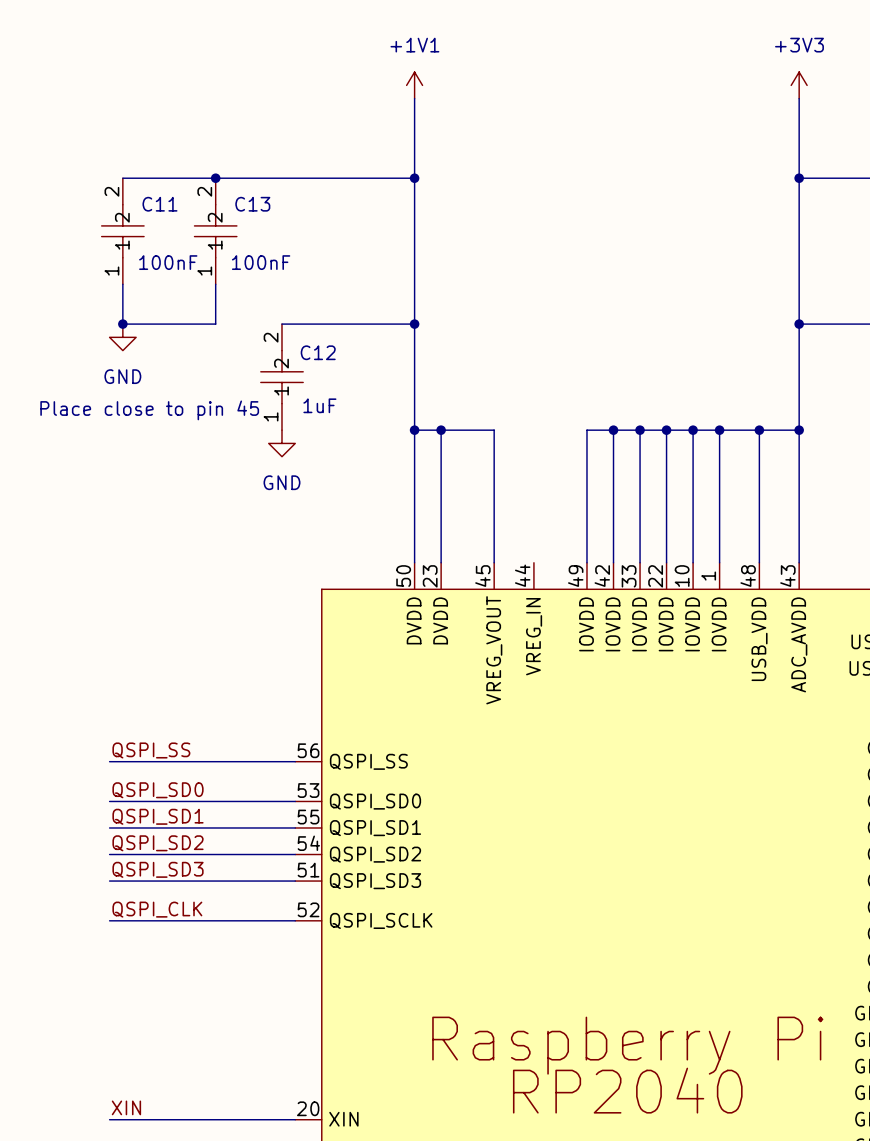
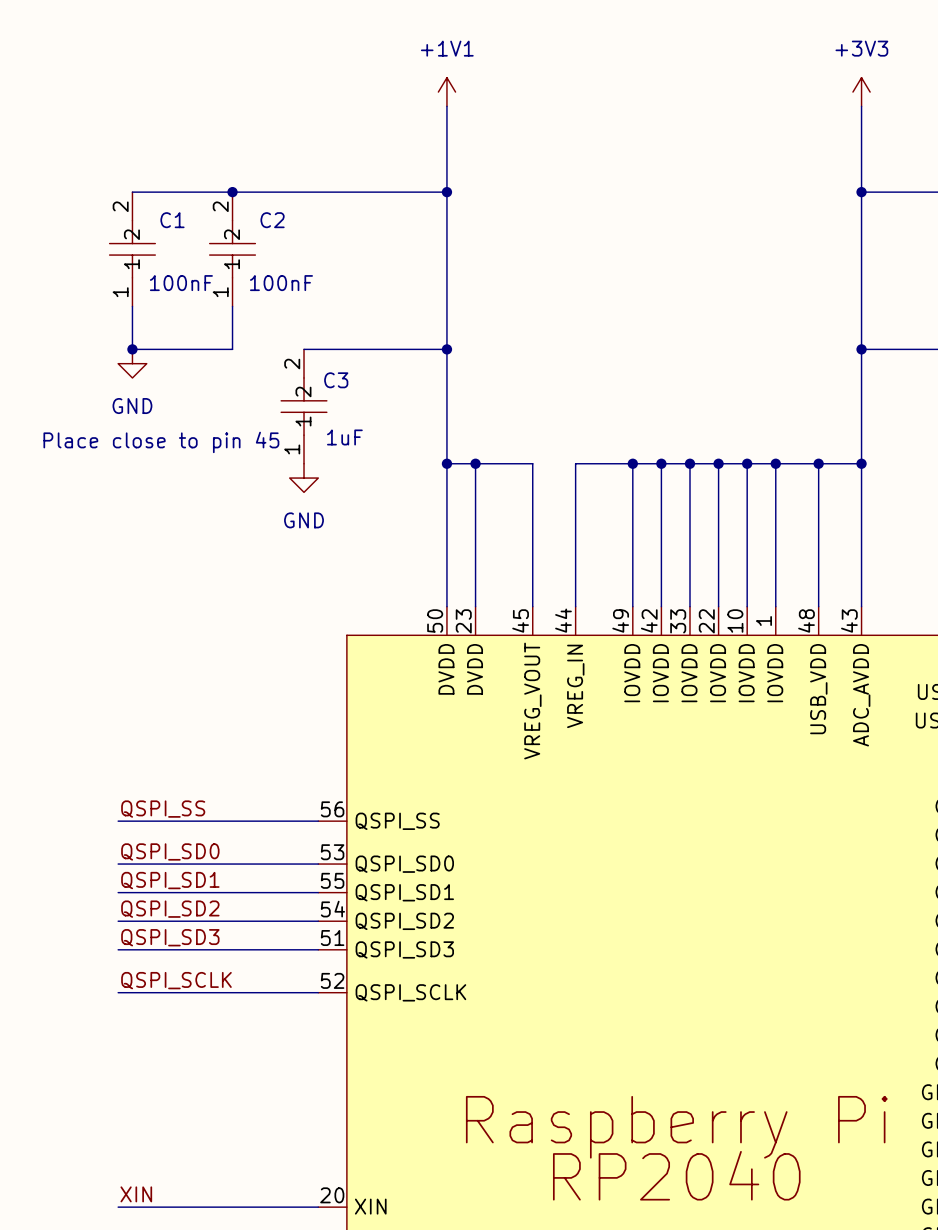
C11 name: C11 (159, 204) -> C1 (172, 220)
C13 name: C13 (252, 204) -> C2 (272, 220)
C12 name: C12 (318, 352) -> C3 (336, 380)
wire: none -> (632, 463) (575, 463) (575, 606)
junction: none -> (632, 463)
label: QSPI_CLK (157, 909) -> QSPI_SCLK (176, 980)

